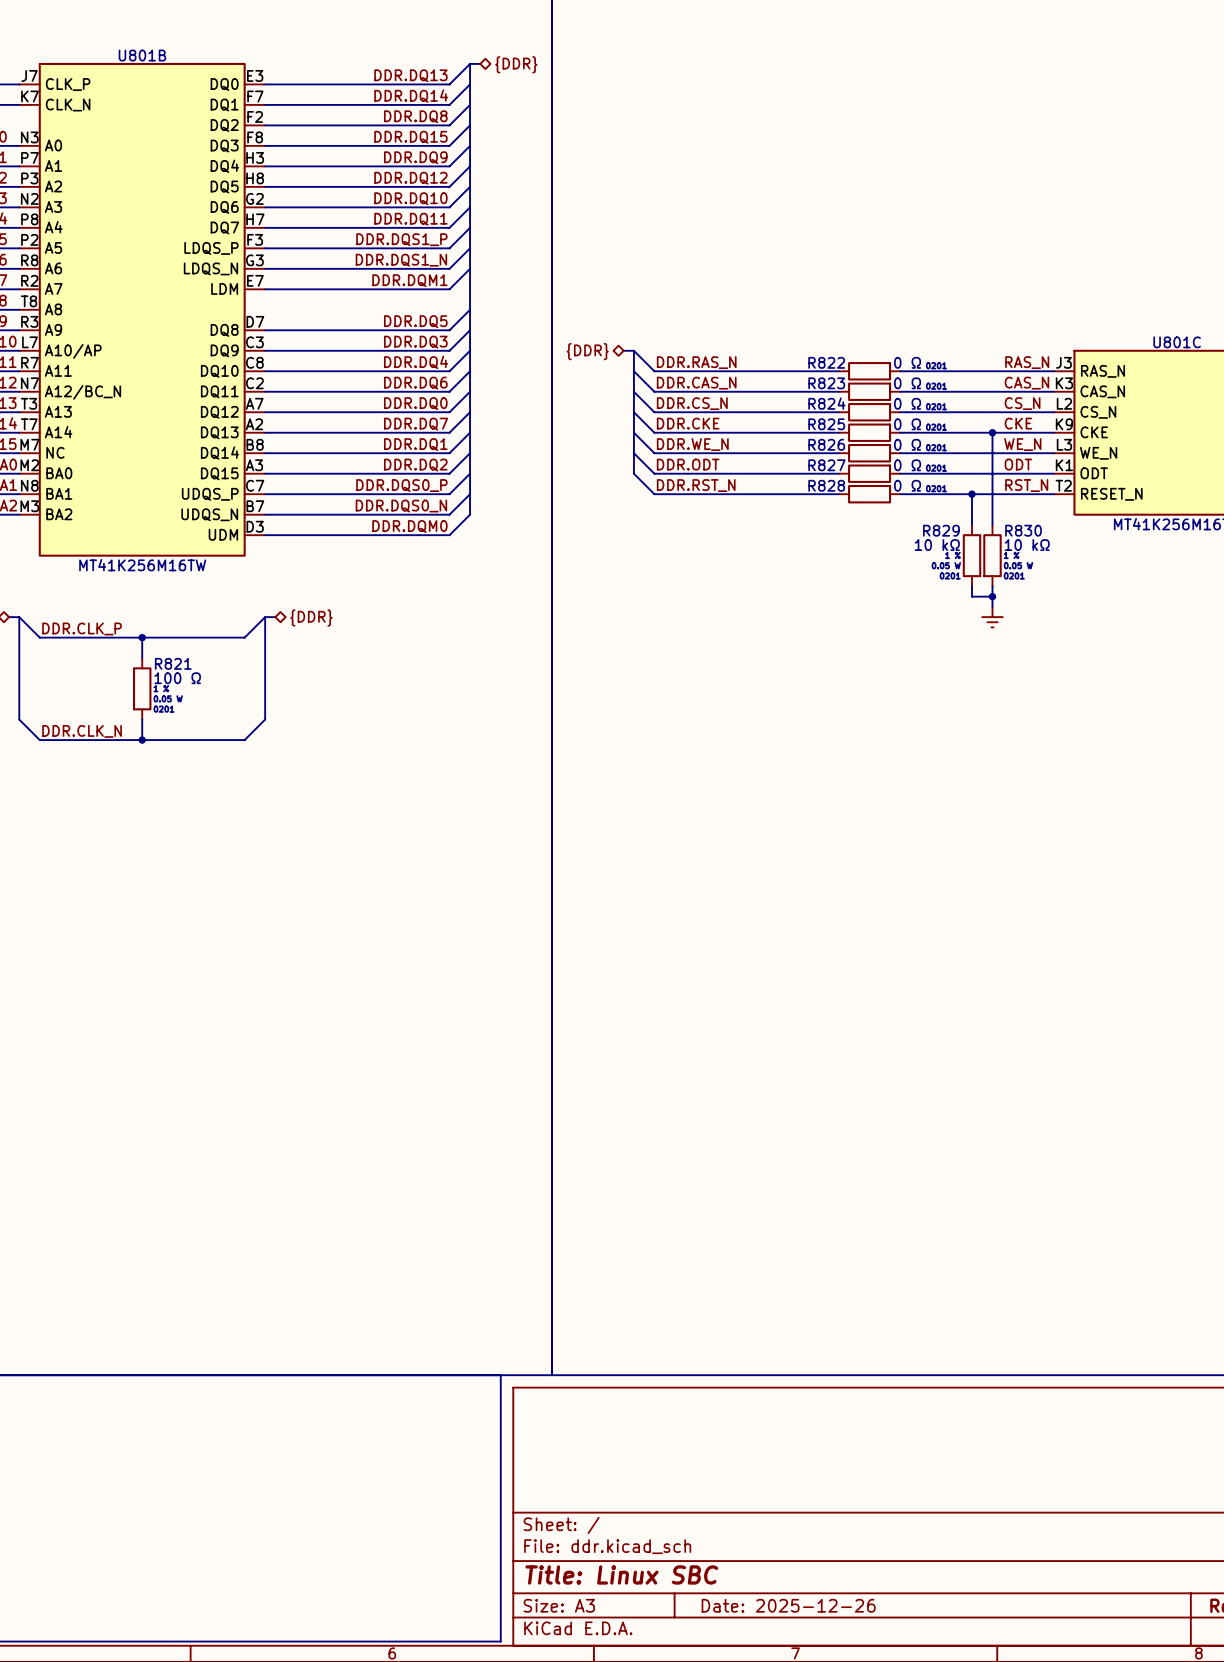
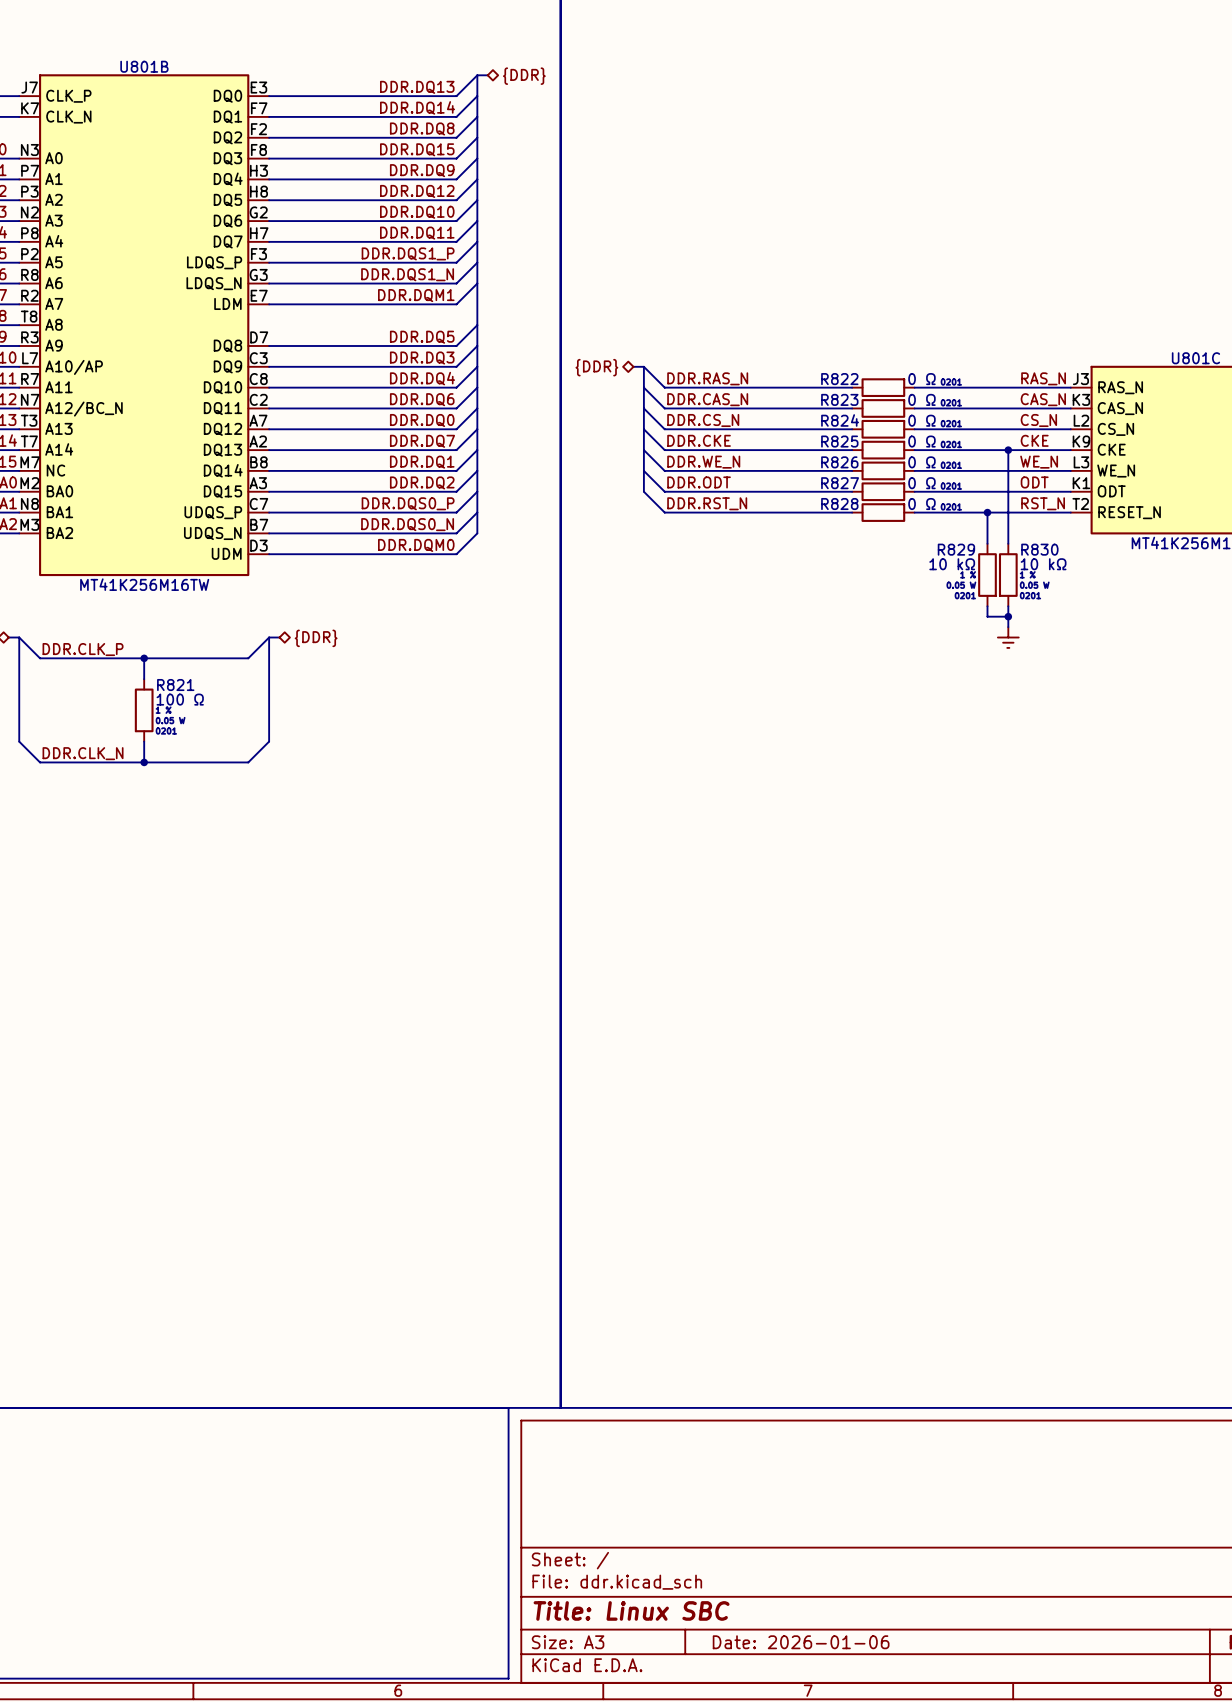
title block: Date: 2025-12-26 (788, 1605) -> Date: 2026-01-06 (801, 1642)

